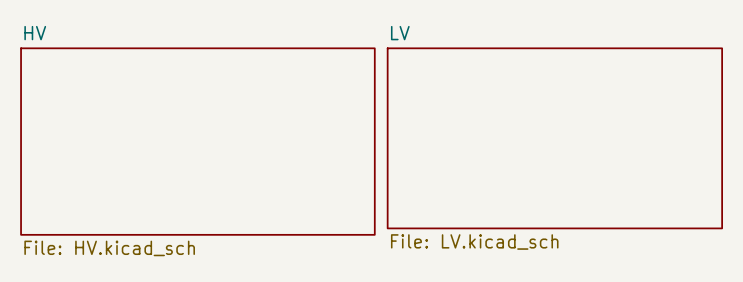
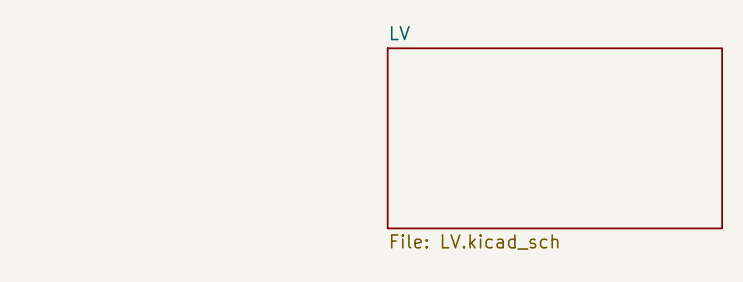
sheet HV: File: HV.kicad_sch (197, 141) -> none

